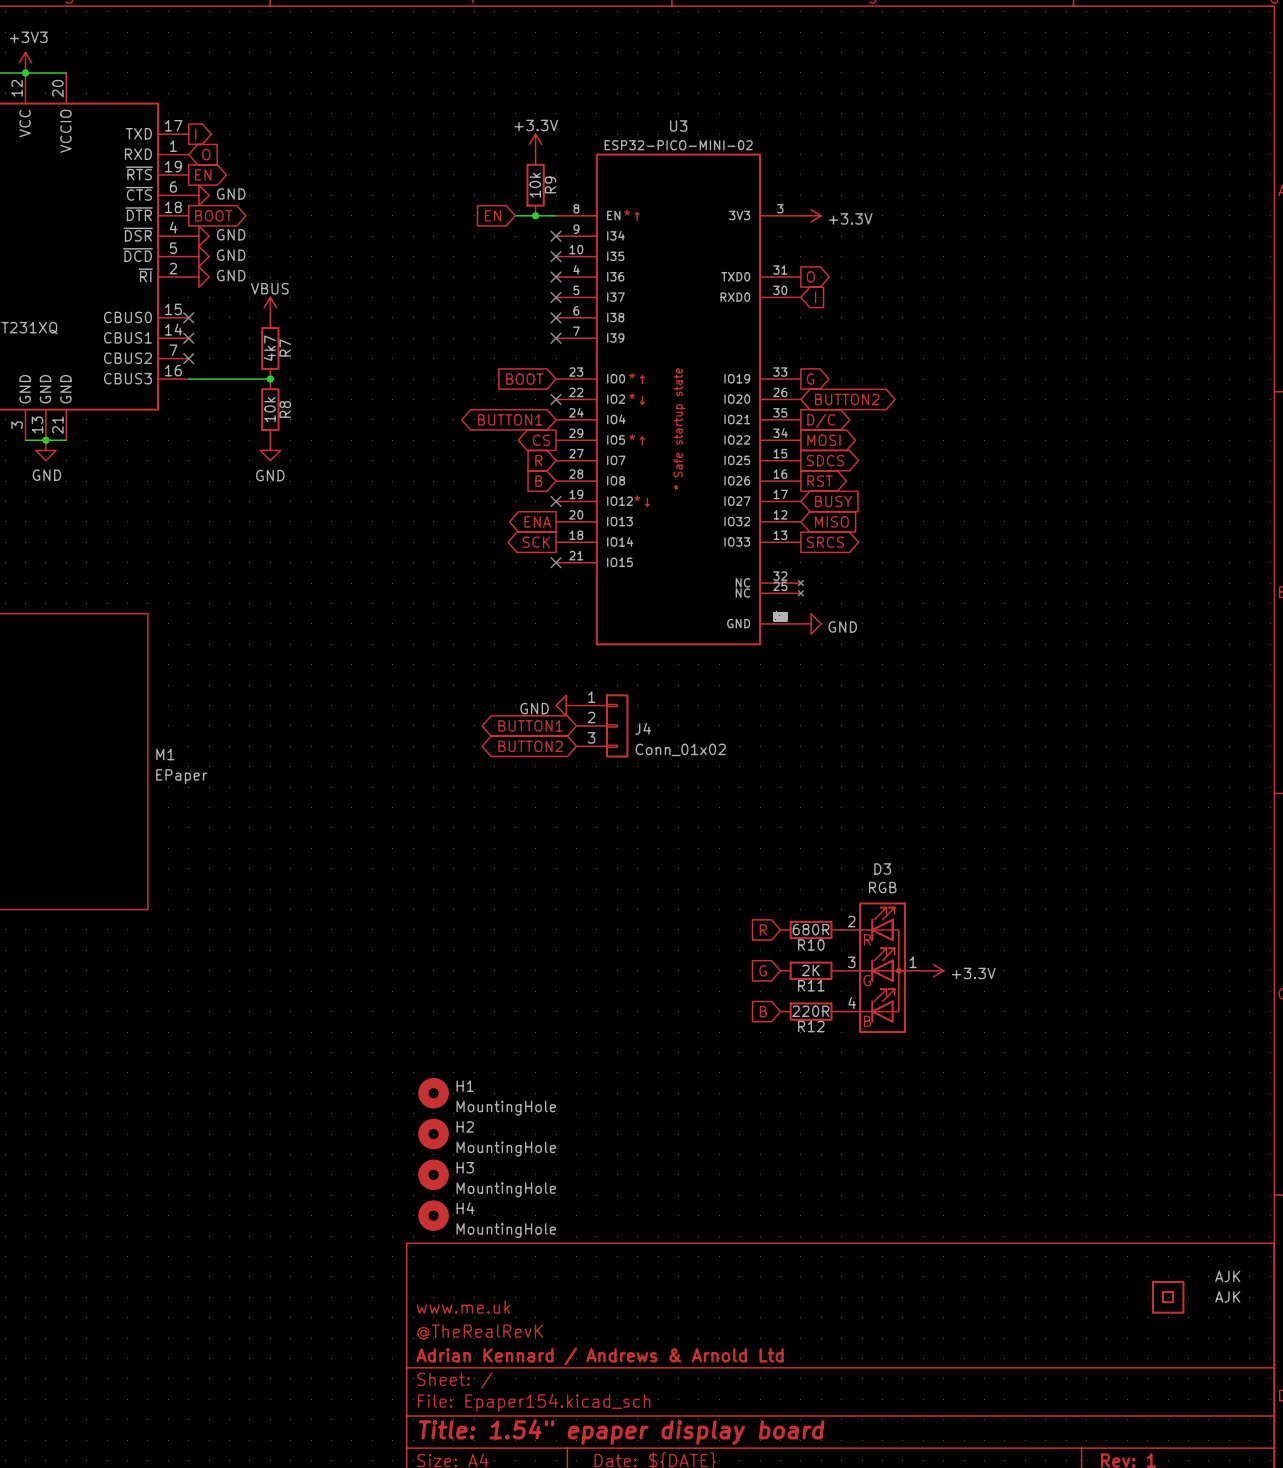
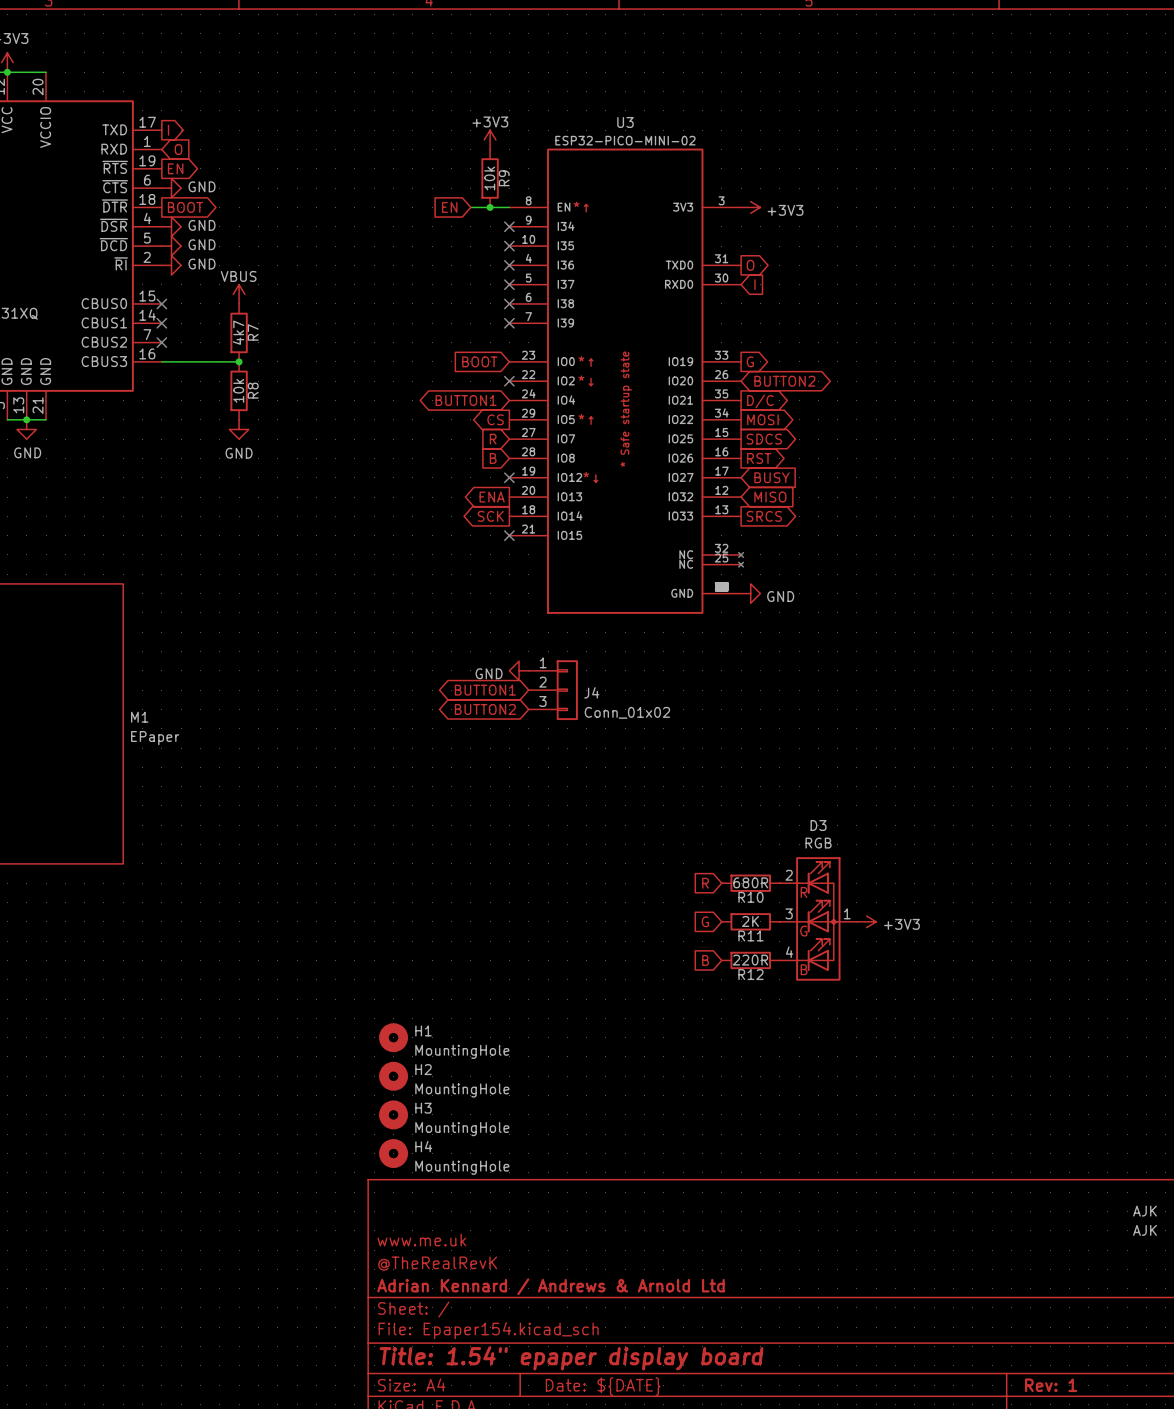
power symbol: +3.3V (535, 144) -> +3V3 (490, 139)
power symbol: +3.3V (811, 215) -> +3V3 (750, 207)
power symbol: +3.3V (933, 970) -> +3V3 (866, 921)
part: (1168, 1297) -> none

